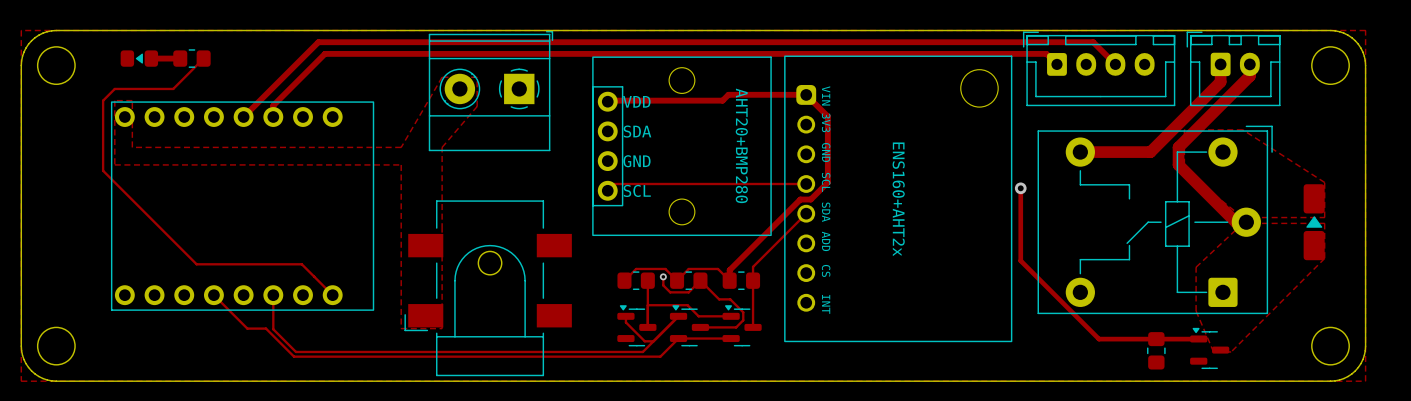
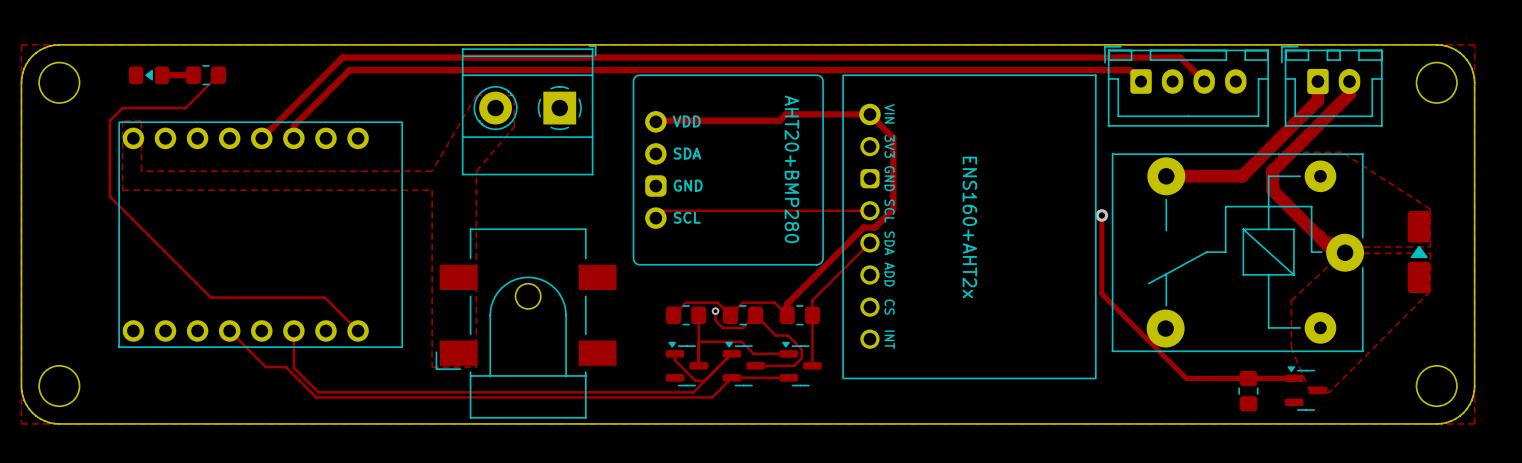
part footprint: [784, 55, 1013, 343] -> [842, 74, 1097, 380]
part footprint: [592, 56, 772, 236] -> [632, 74, 824, 266]
part footprint: [1037, 125, 1273, 315] -> [1111, 153, 1365, 353]

